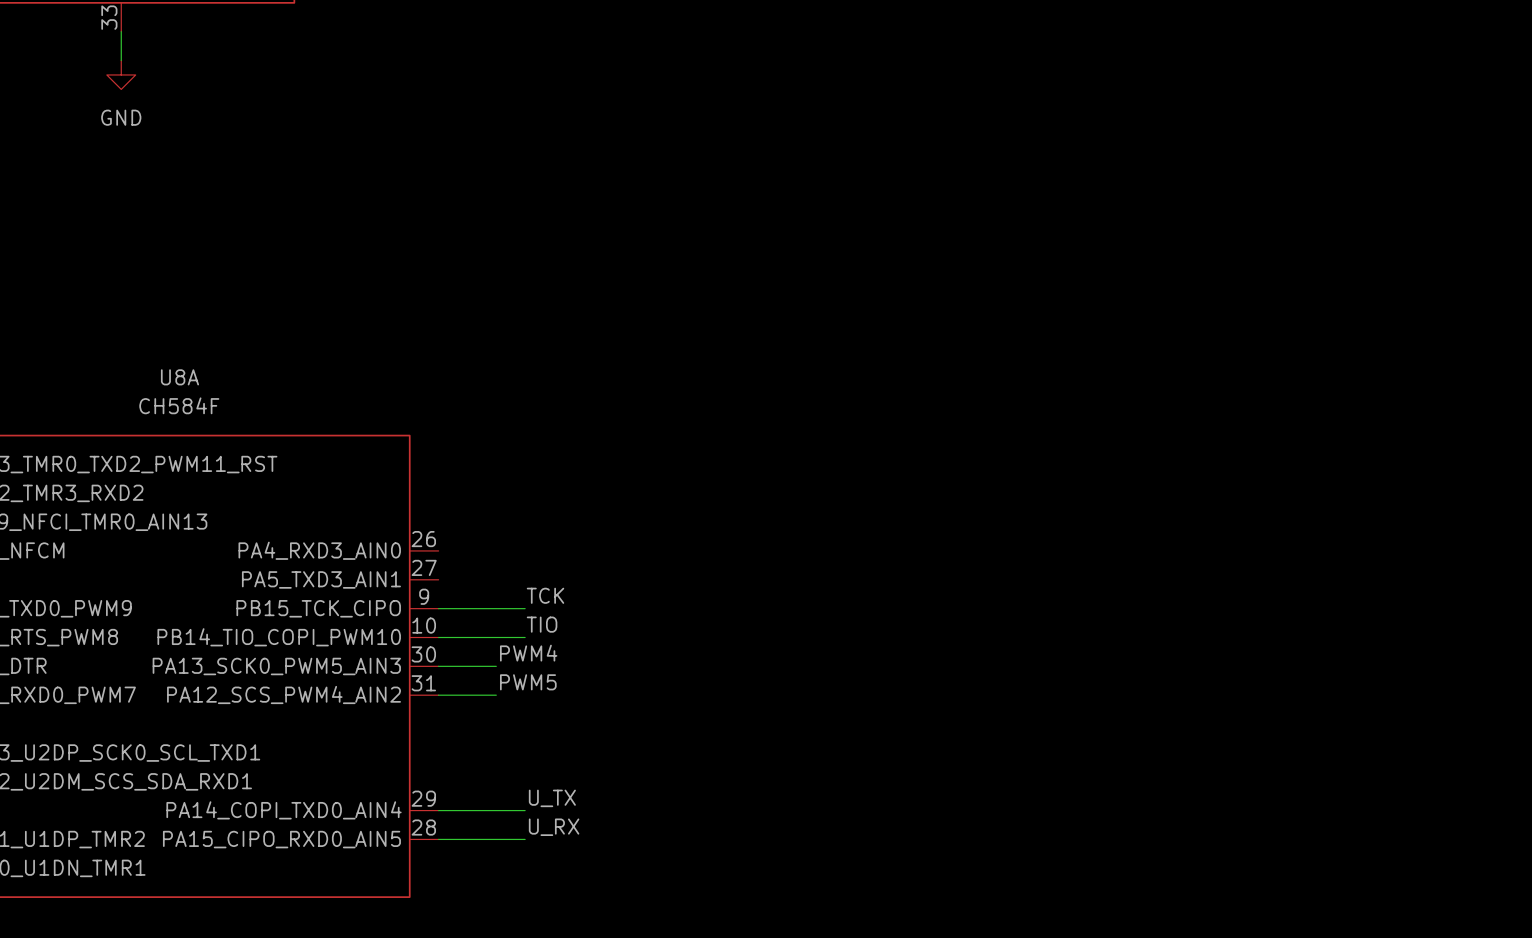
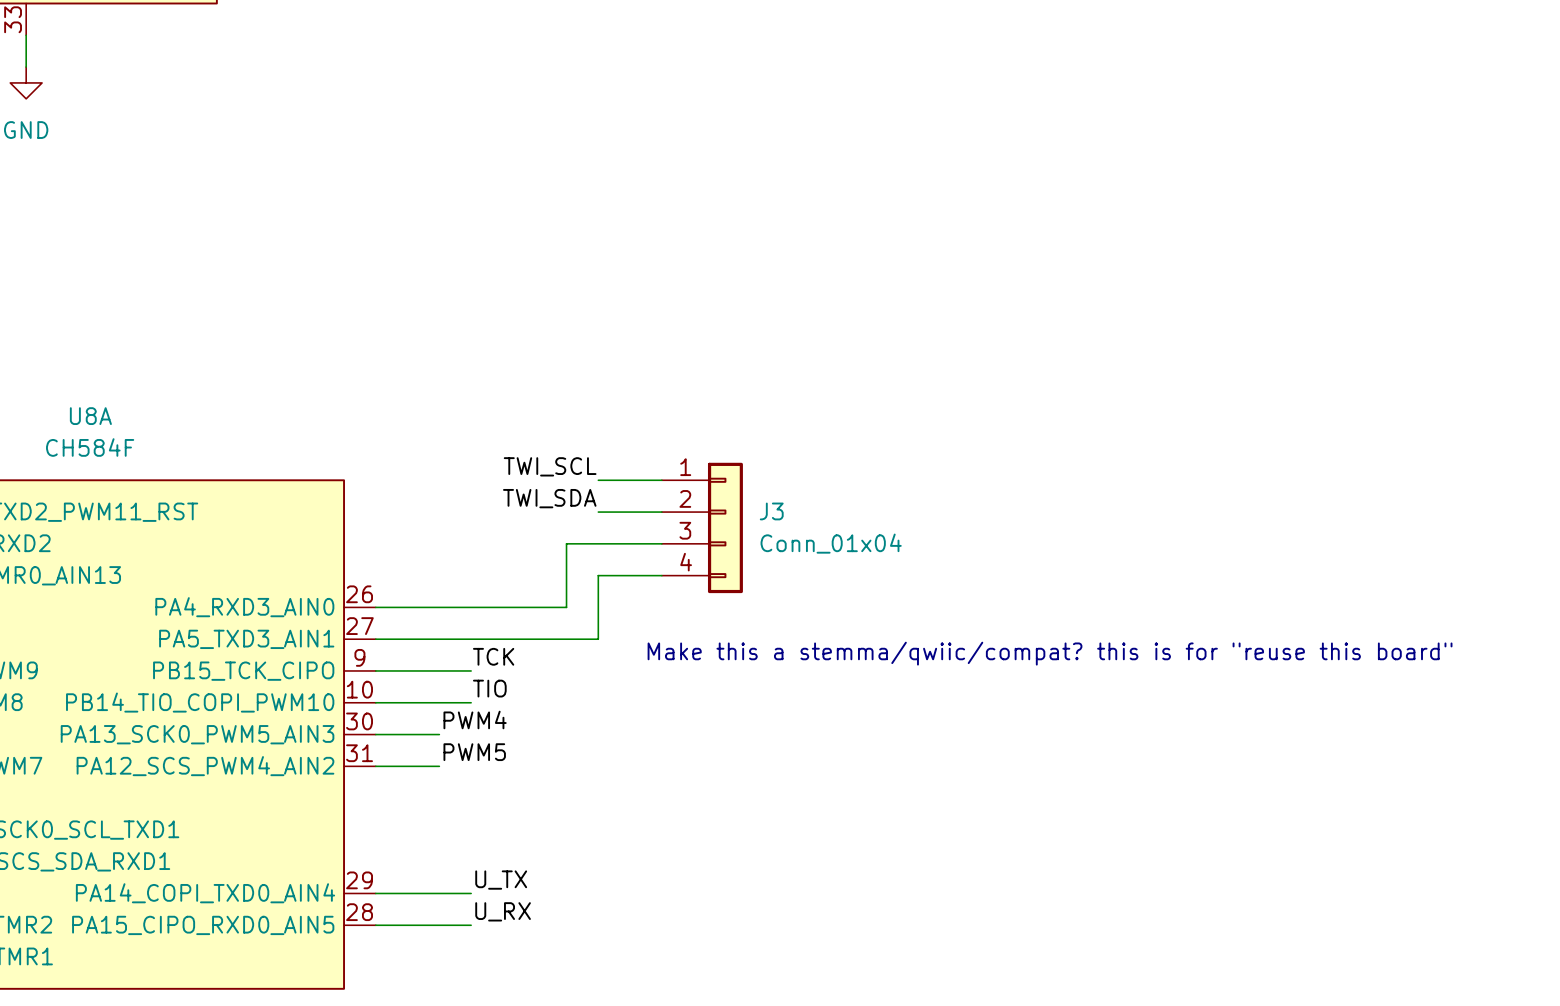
label: none -> TWI_SCL (550, 466)
wire: none -> (598, 480) (661, 480)
label: none -> TWI_SDA (549, 498)
wire: none -> (598, 512) (661, 512)
J3: none -> Conn_01x04 (702, 527)
wire: none -> (661, 543) (566, 543) (566, 607) (375, 607)
wire: none -> (661, 575) (598, 575) (598, 639) (375, 639)
text: none -> Make this a stemma/qwiic/compat? this is for "reuse this board" (1050, 653)

